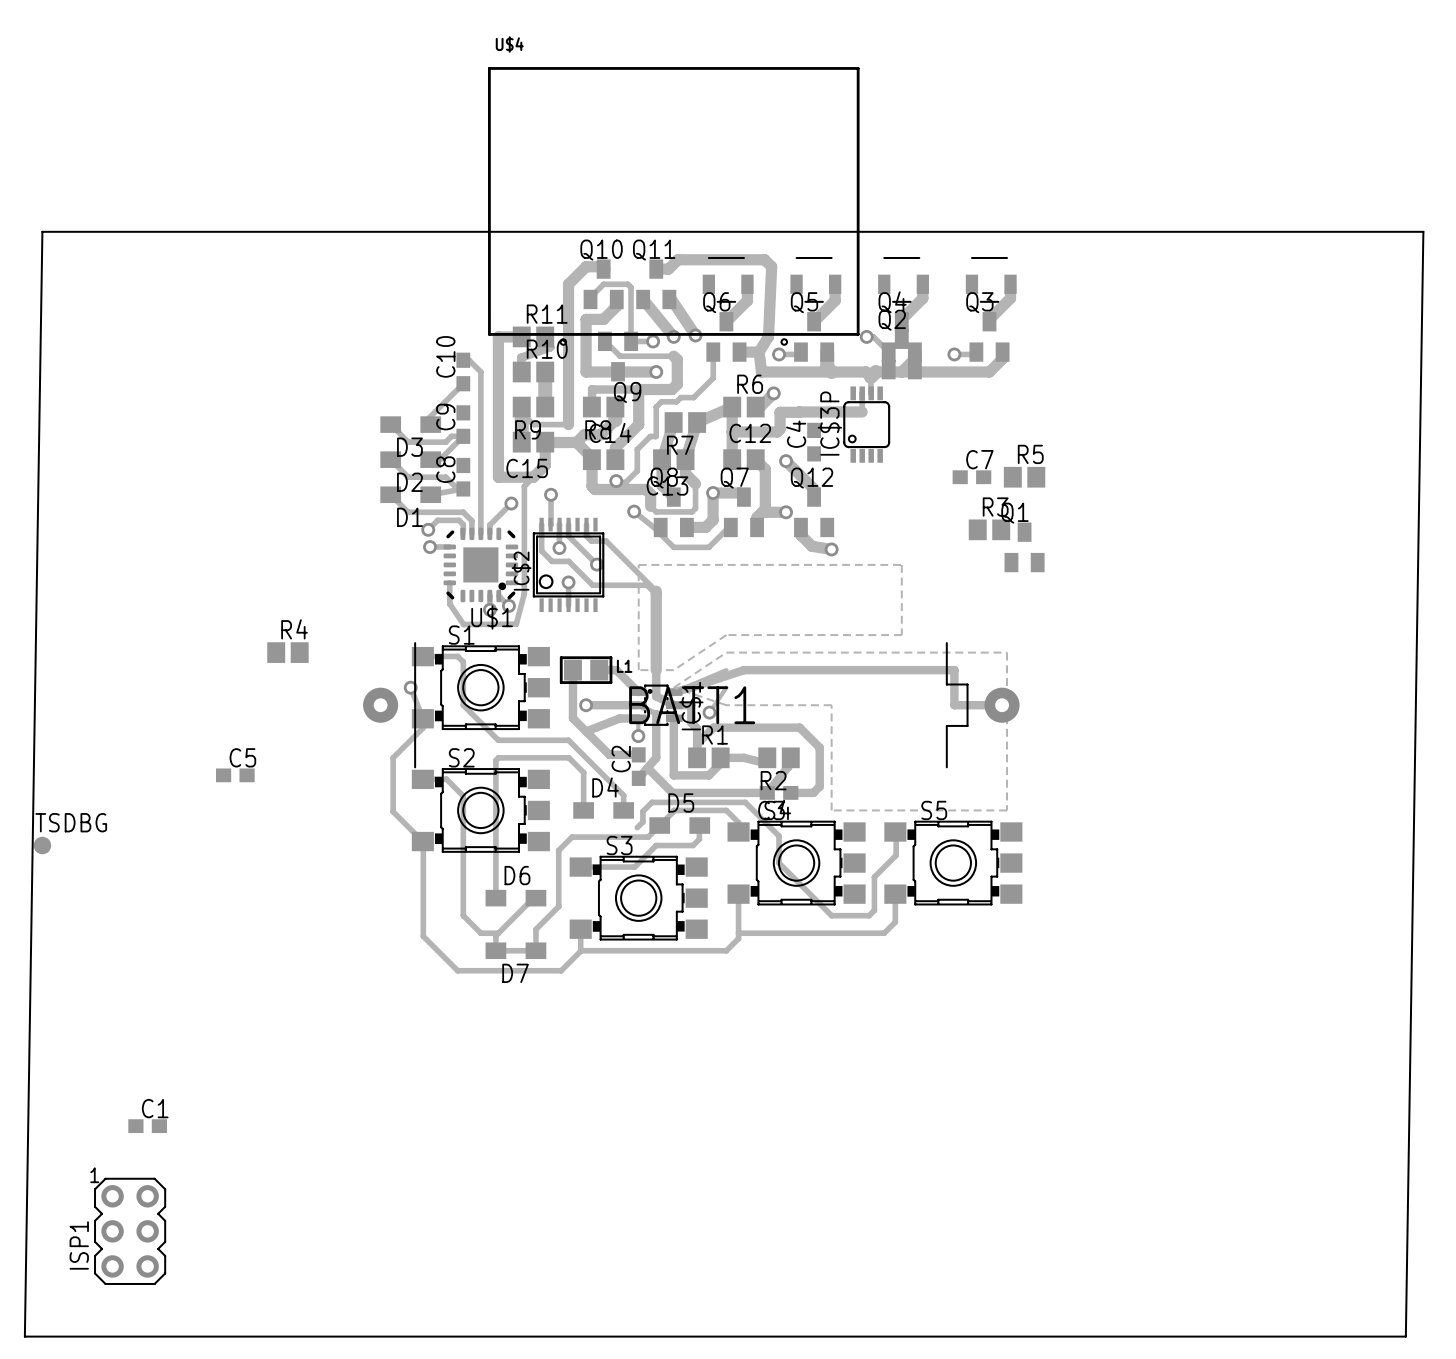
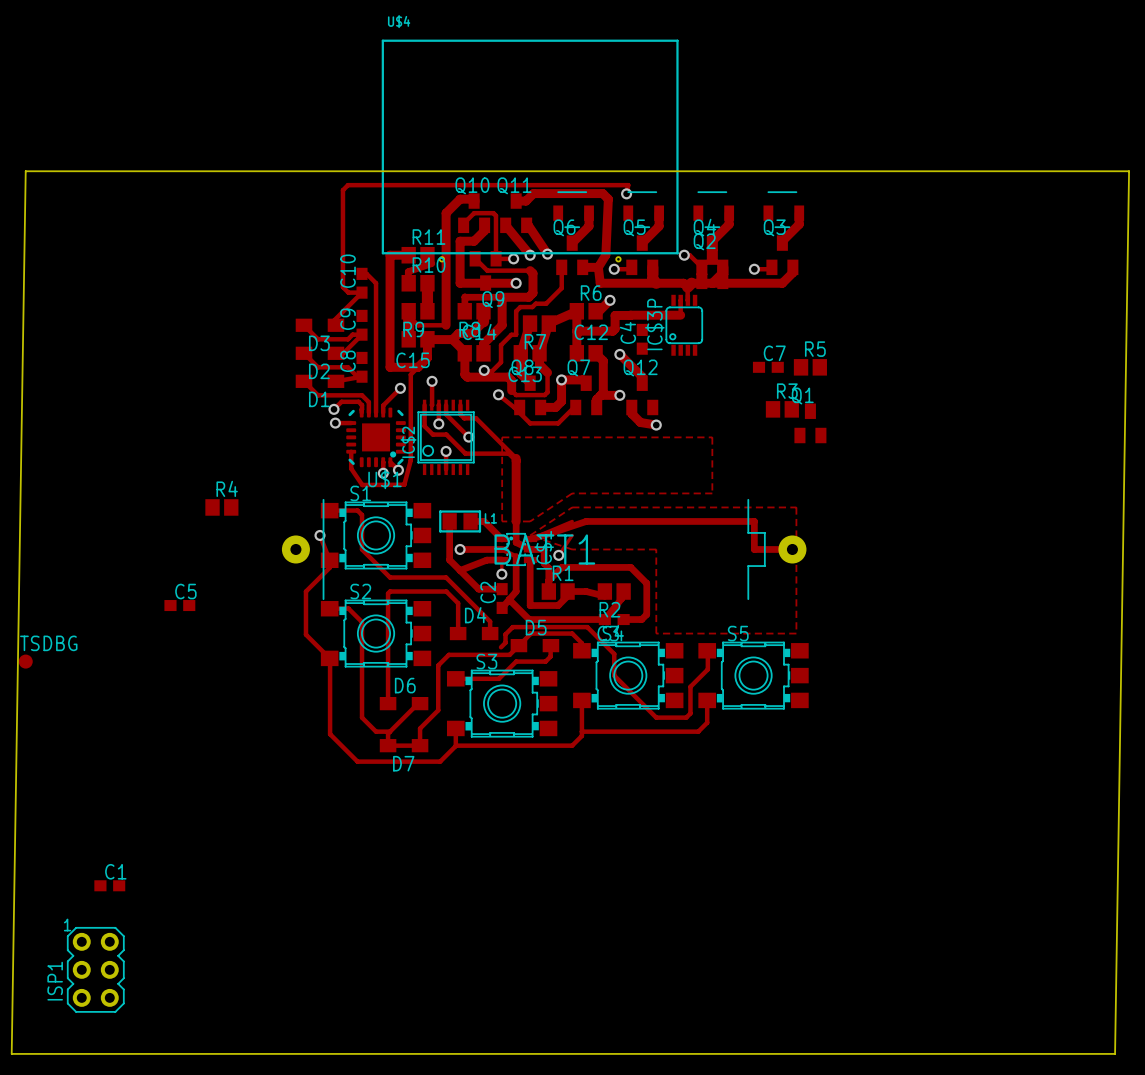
track: none -> (626, 193) (628, 185) (348, 185) (342, 190) (342, 287) (348, 292) (362, 292)
via: none -> (626, 193)

